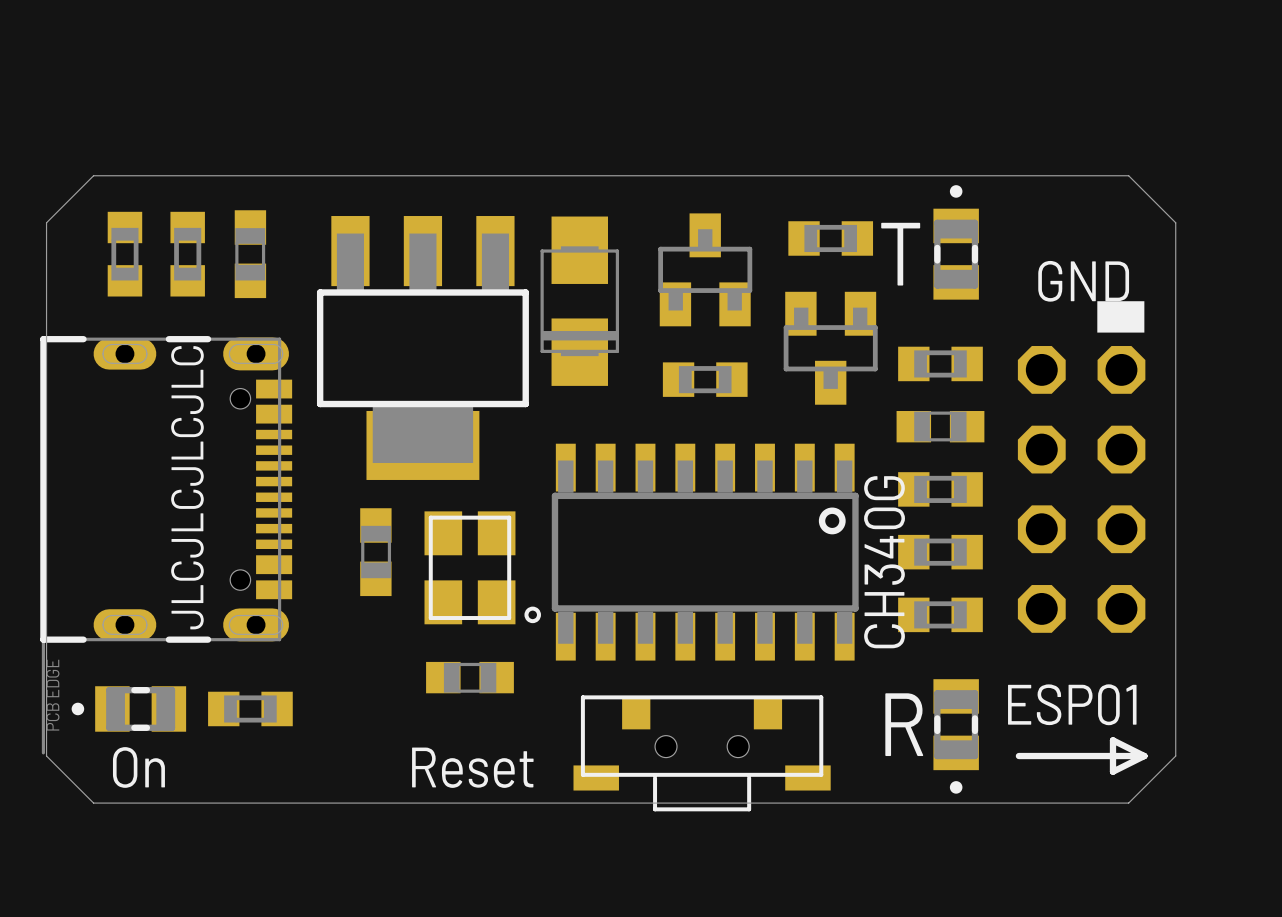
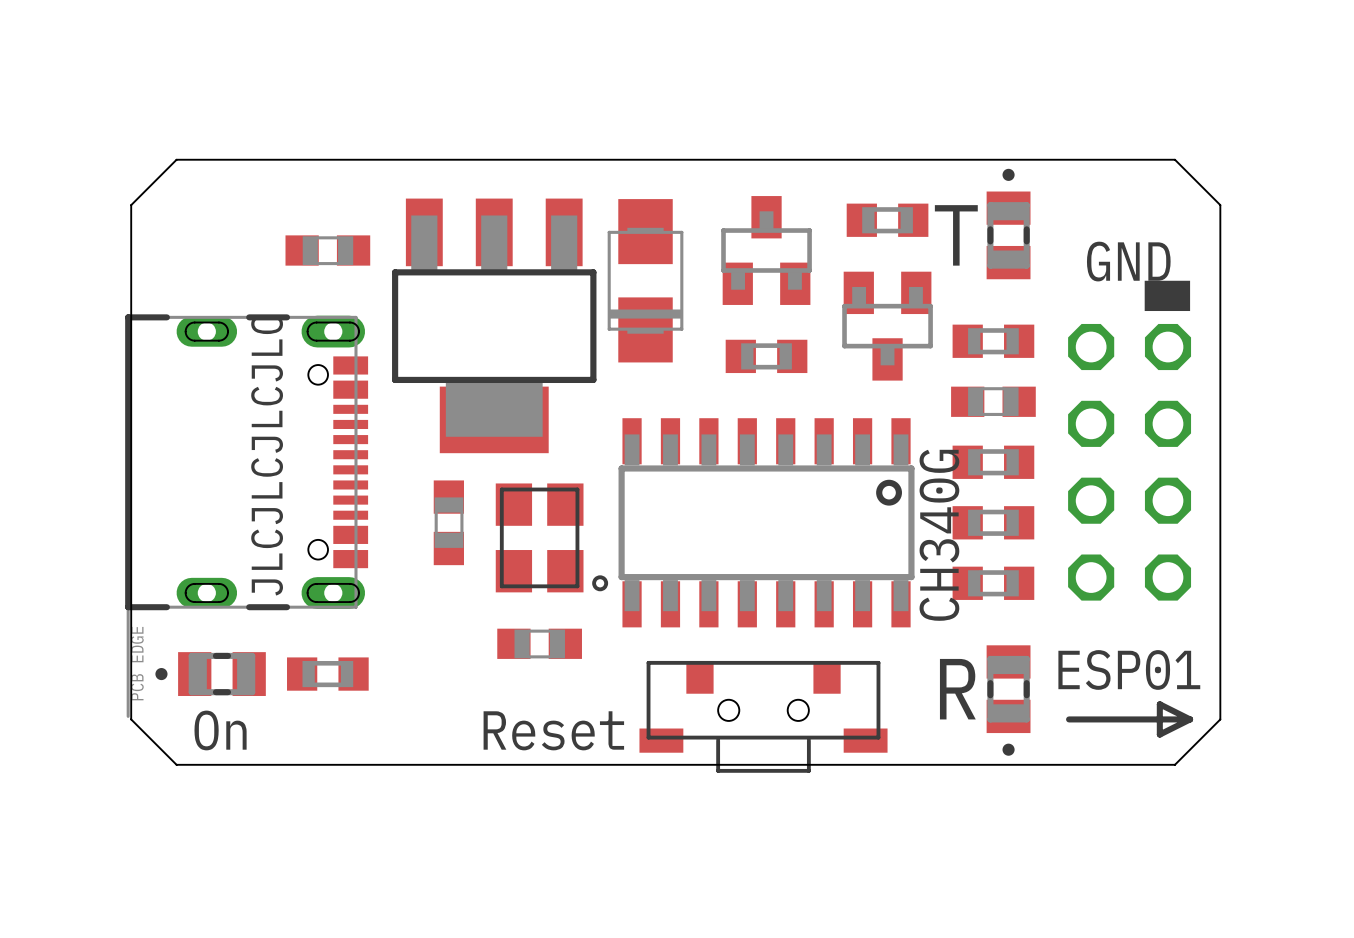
part: (124, 254) -> none
part: (187, 254) -> none
part rotation: 0° (250, 254) -> 90° clockwise (327, 250)

